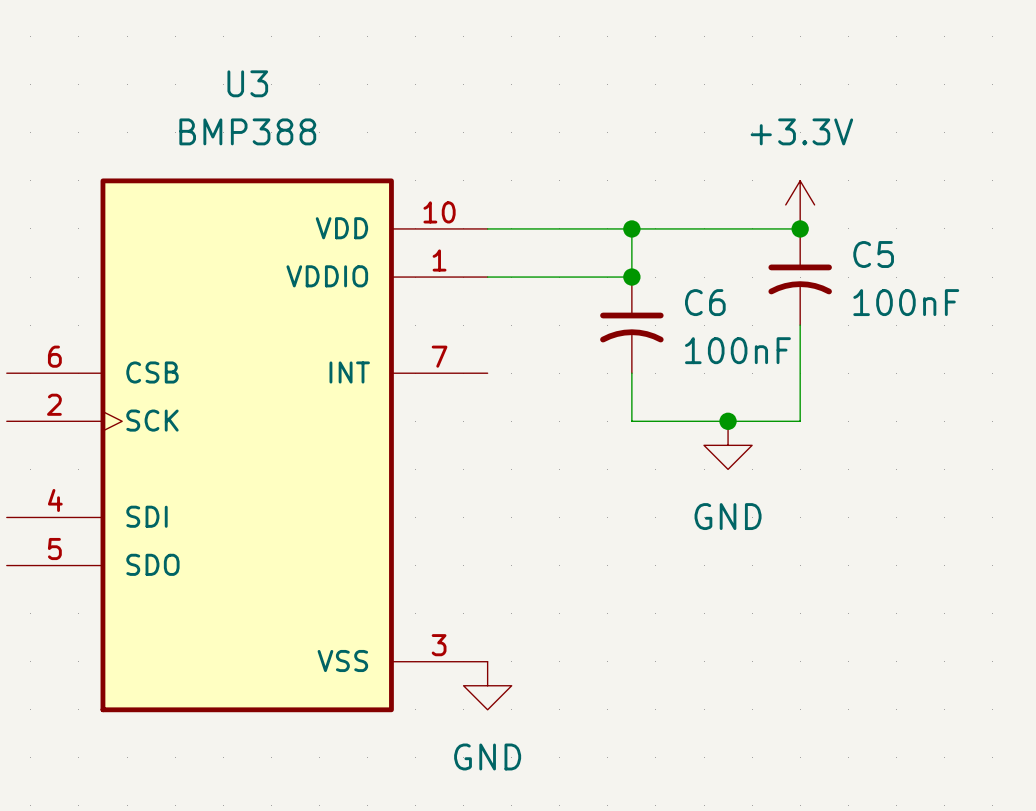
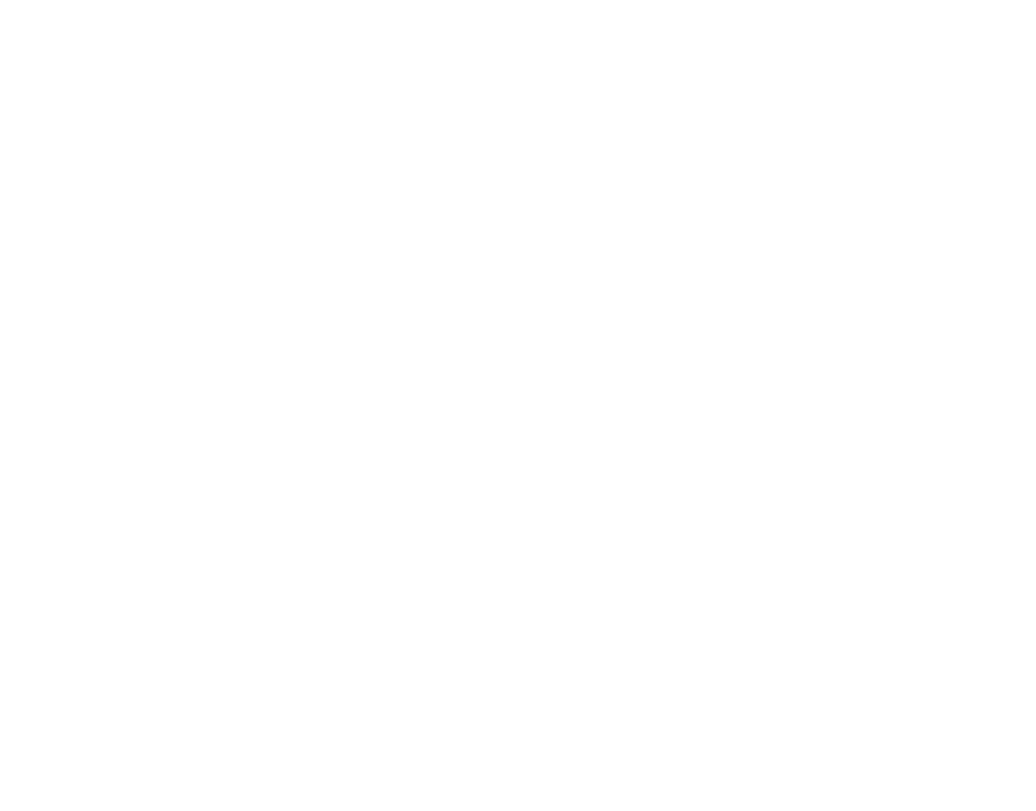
power symbol: +3.3V (800, 204) -> none
wire: (487, 228) (800, 228) -> none
wire: (631, 228) (631, 277) (487, 277) -> none
junction: (631, 228) -> none
junction: (800, 228) -> none
junction: (631, 277) -> none
C5: 100nF (800, 277) -> none
C6: 100nF (631, 325) -> none
wire: (800, 325) (800, 421) (631, 421) (631, 373) -> none
junction: (728, 421) -> none
U3: BMP388 (247, 445) -> none
power symbol: GND (728, 445) -> none
power symbol: GND (487, 685) -> none

